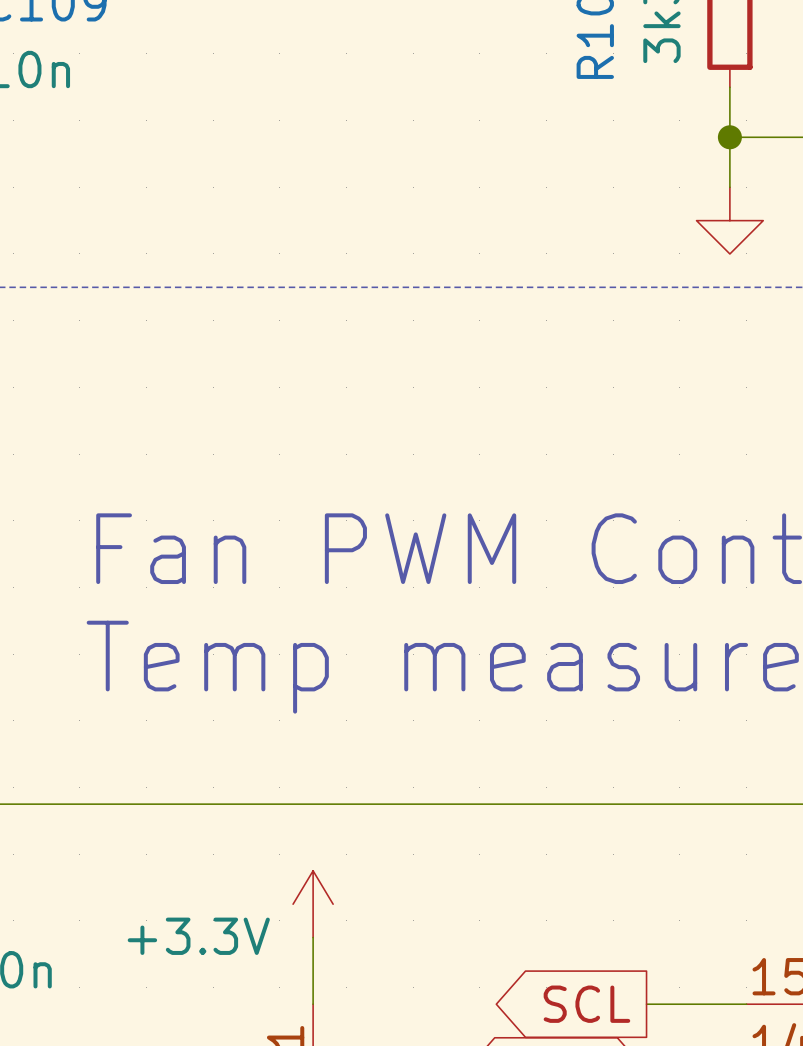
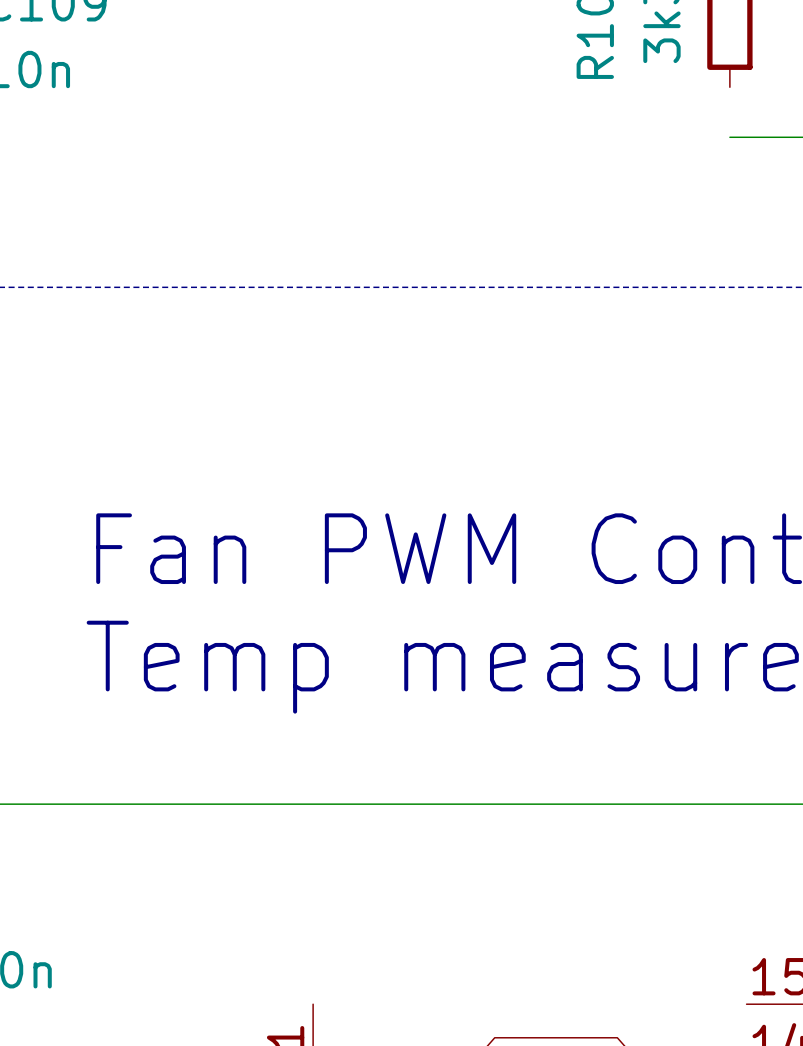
wire: (729, 87) (729, 187) -> none
junction: (729, 137) -> none
power symbol: (729, 220) -> none
power symbol: +3.3V (313, 904) -> none
wire: (313, 937) (313, 1004) -> none
global label: SCL (586, 1004) -> none
wire: (646, 1004) (746, 1004) -> none

